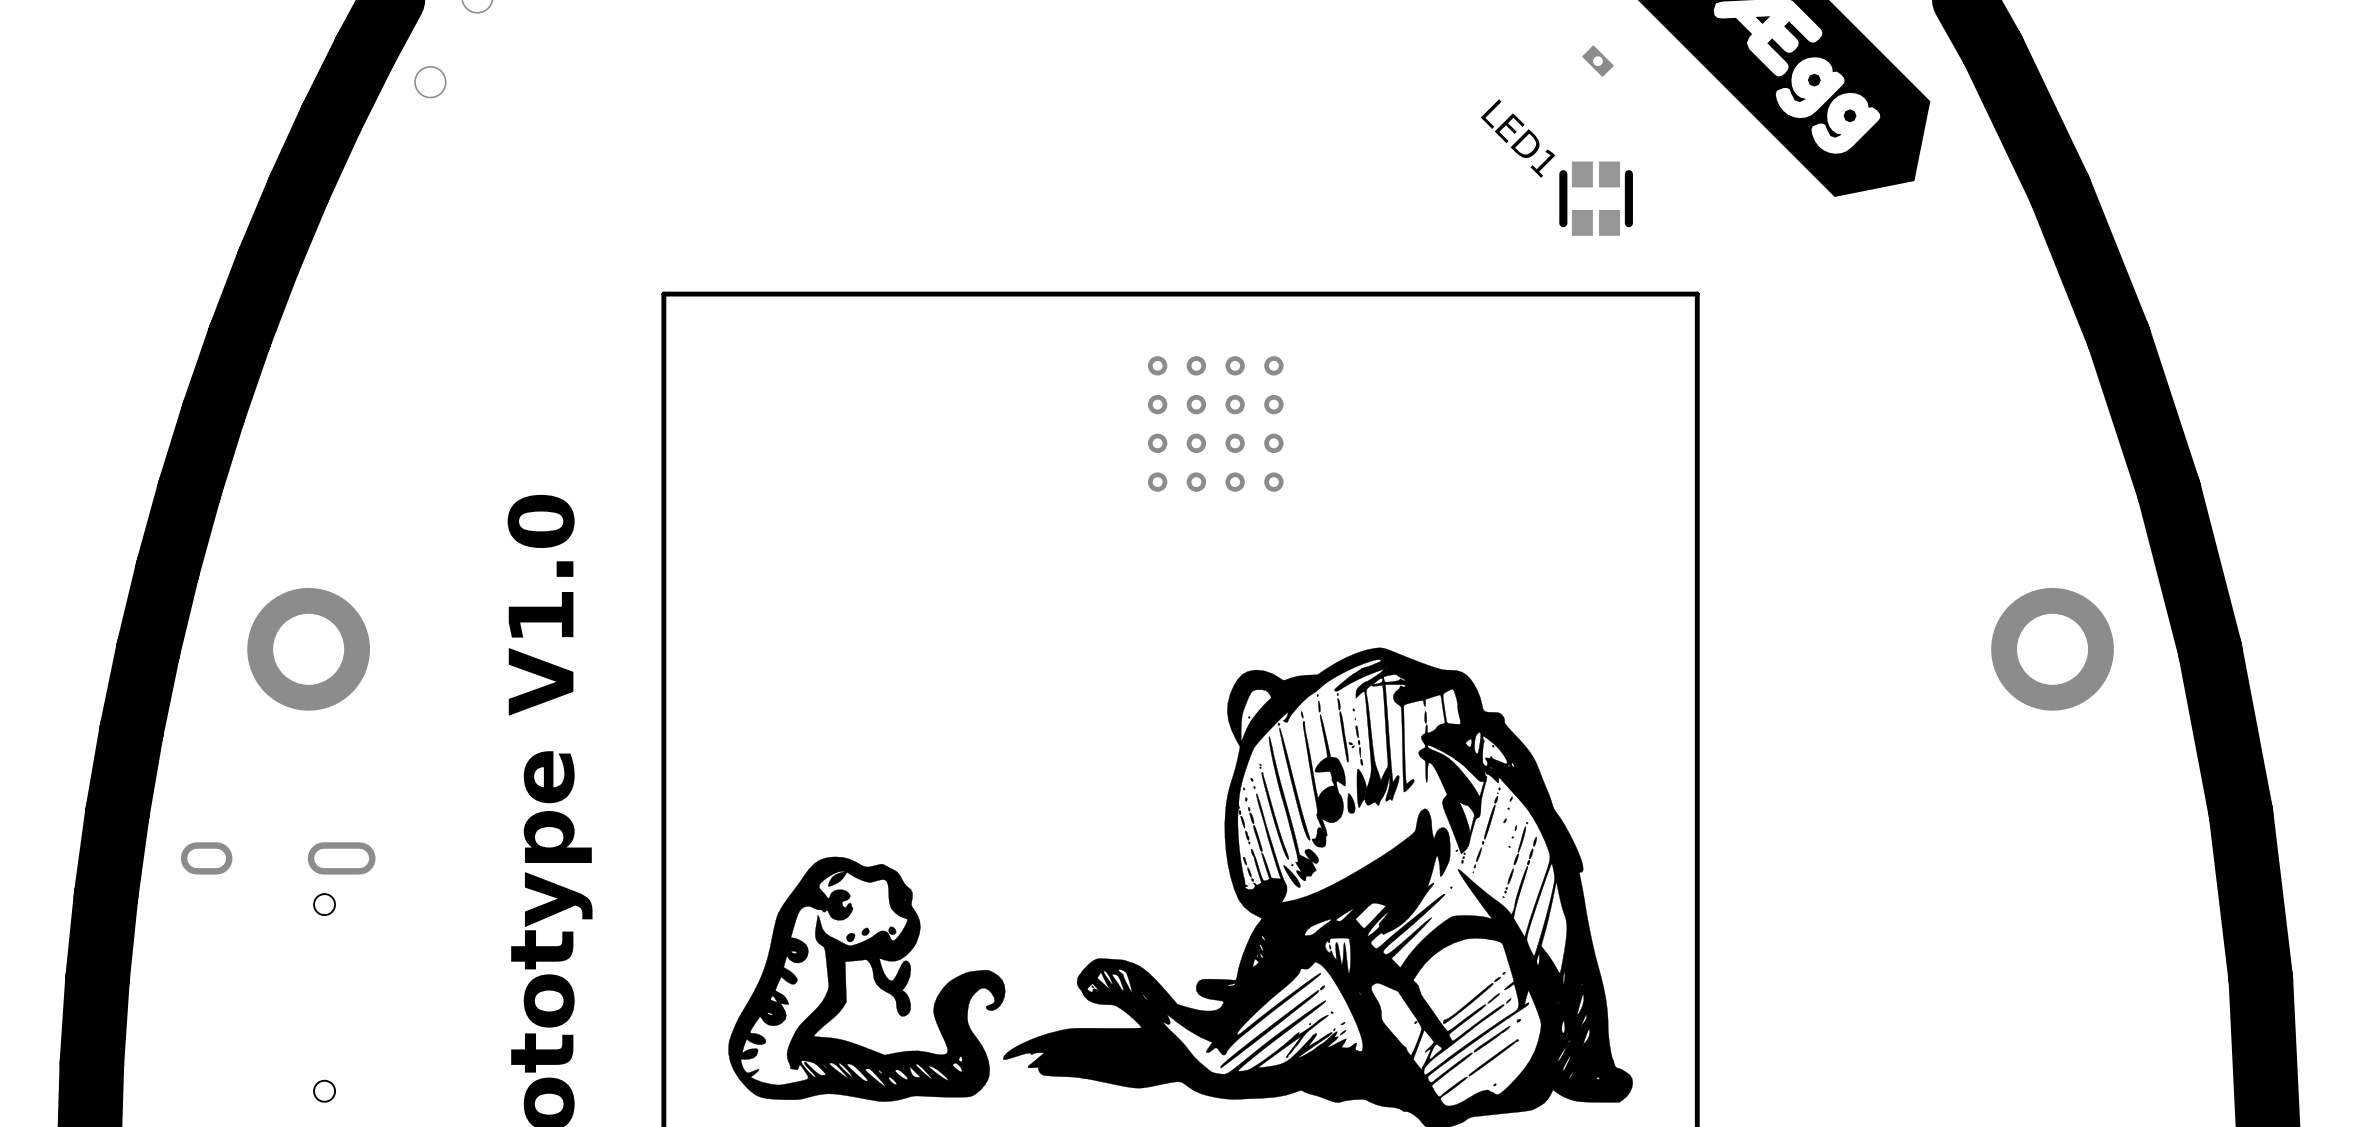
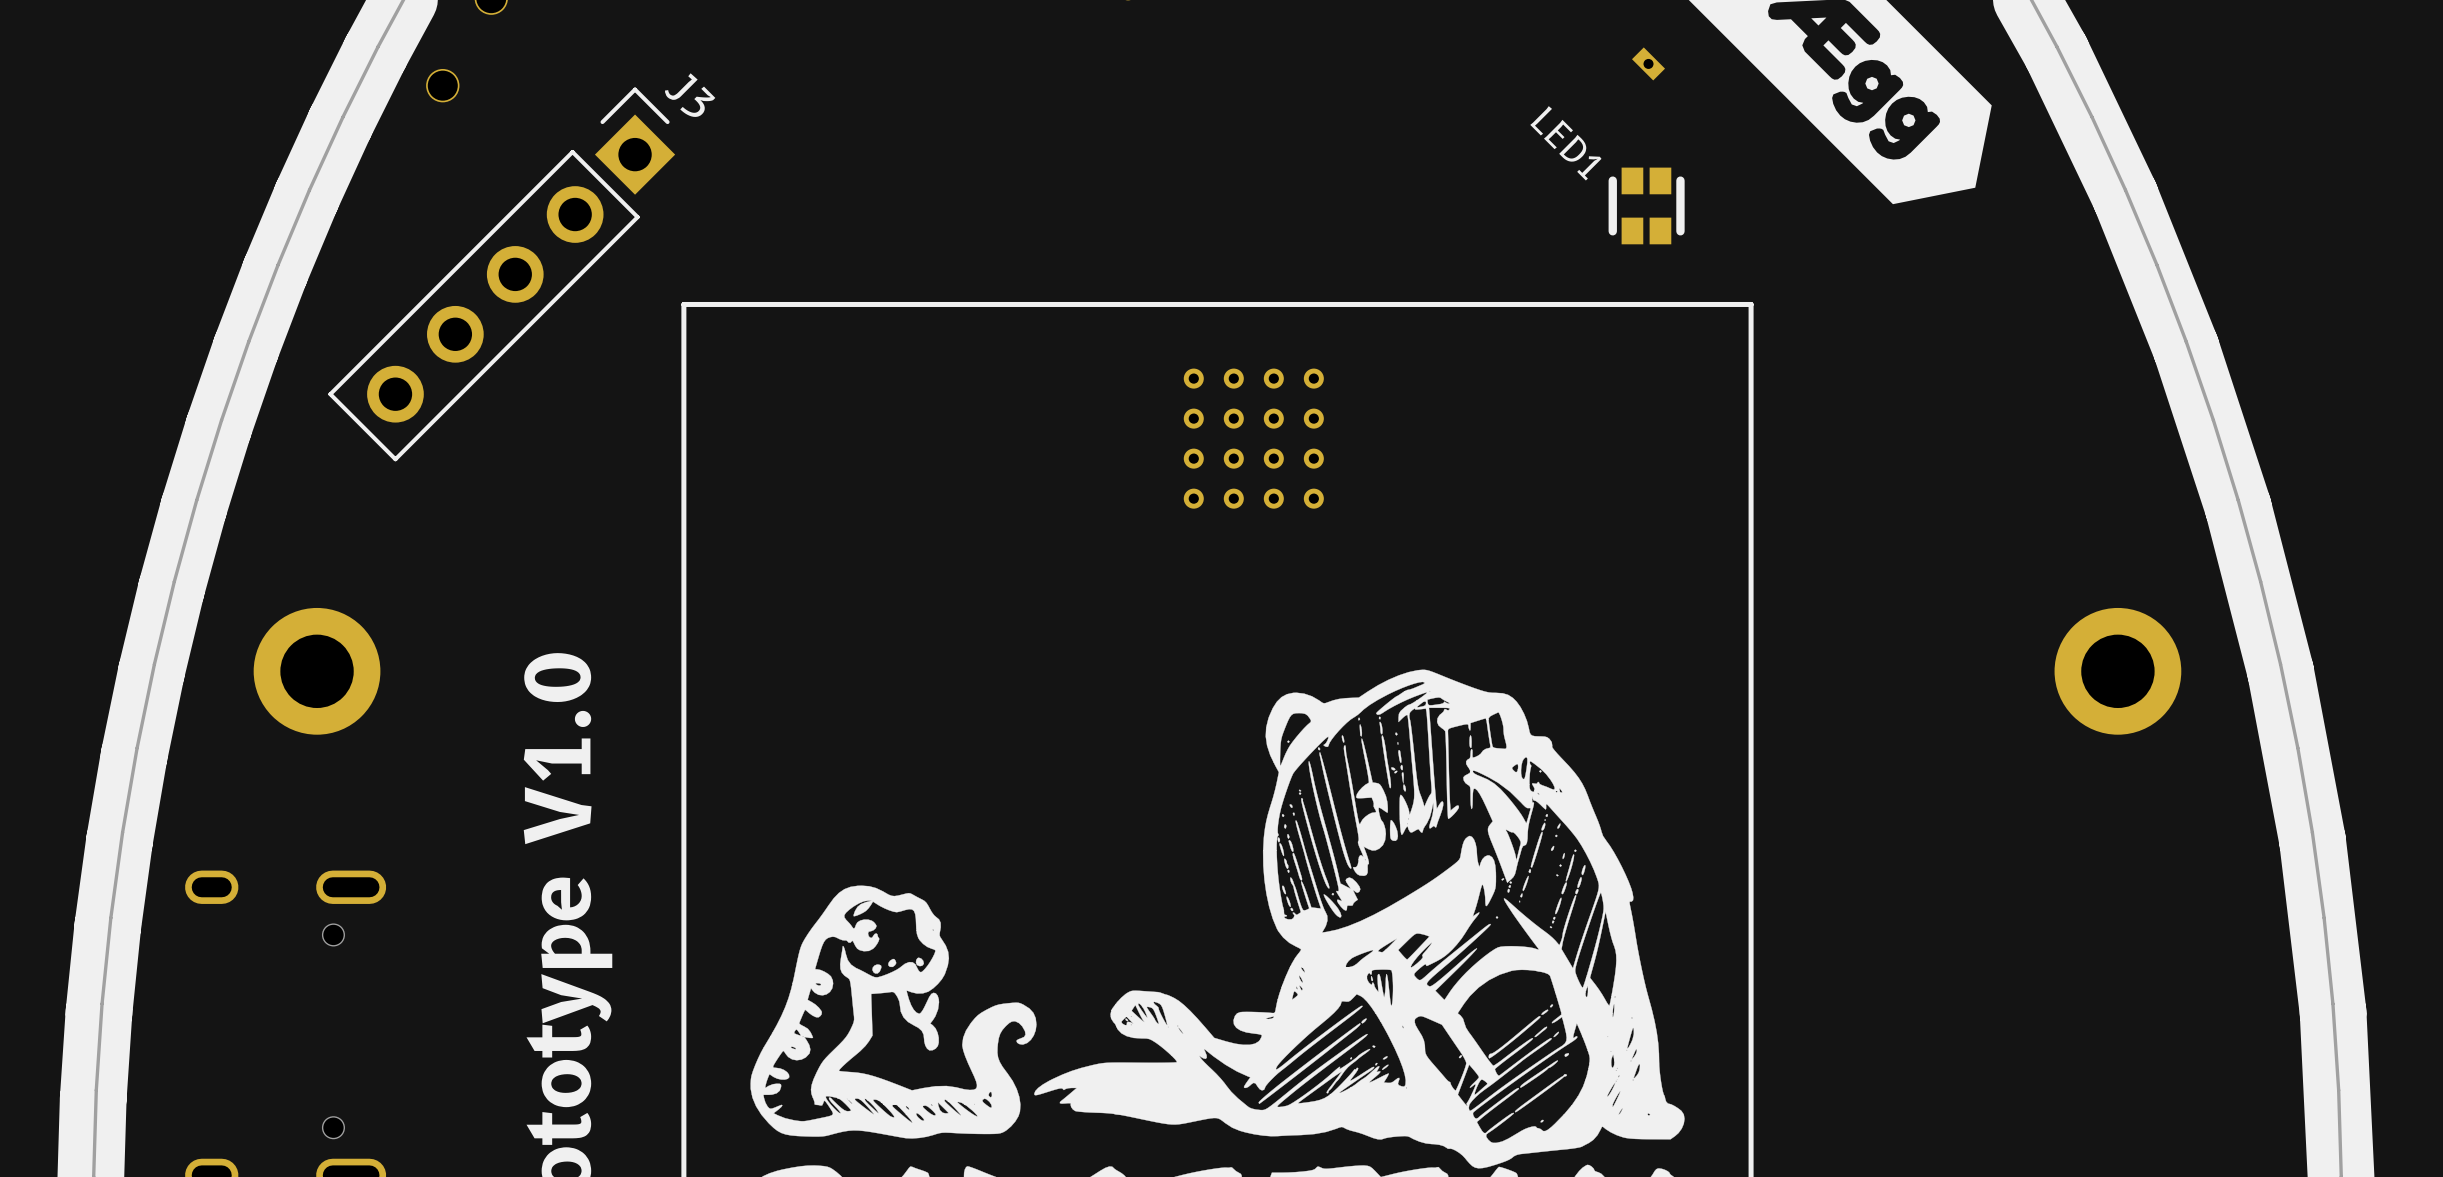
J3: none -> (501, 274)

